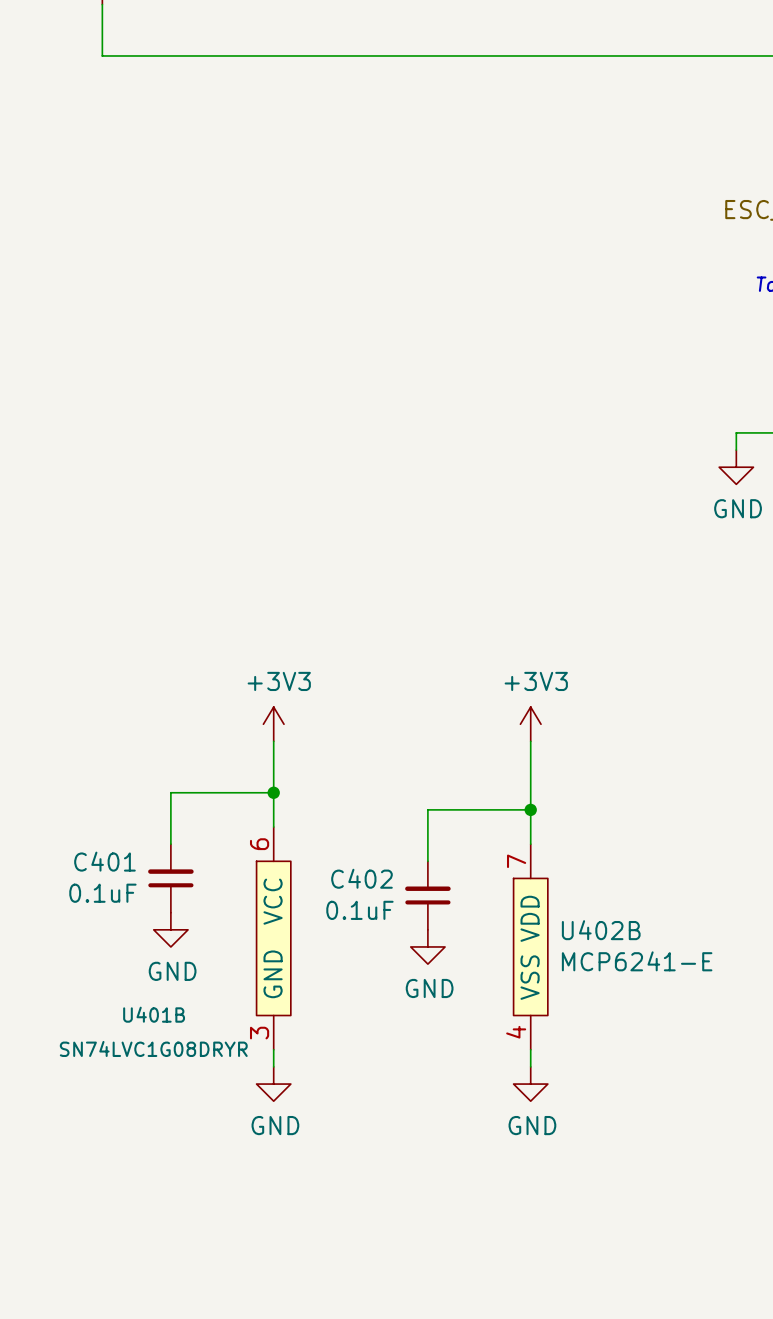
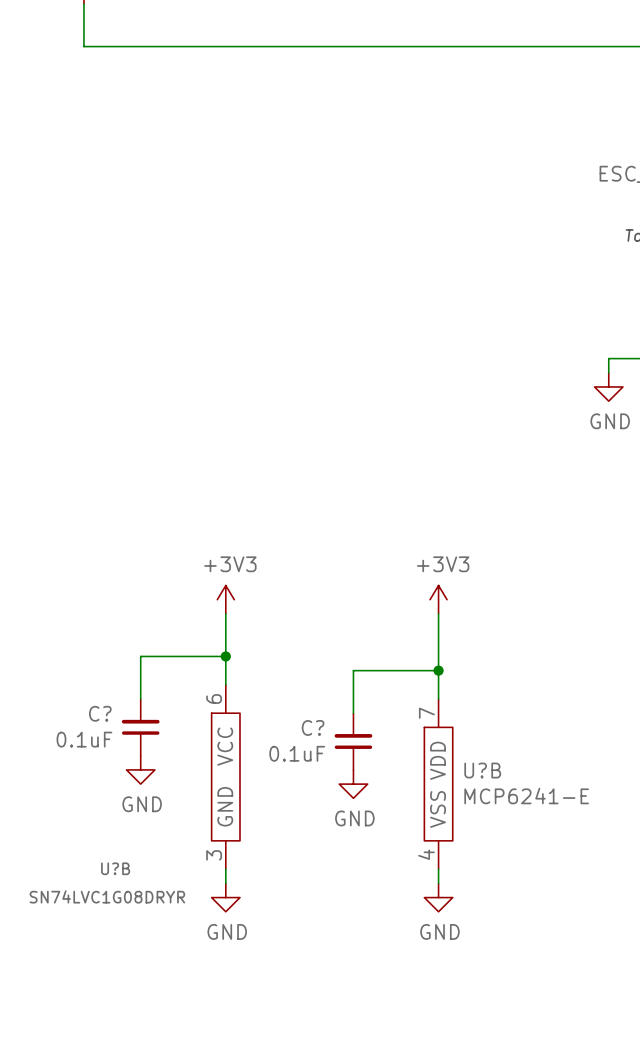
C401 name: C401 (104, 861) -> C? (100, 713)
C402 name: C402 (361, 878) -> C? (313, 727)
U402B name: U402B (601, 930) -> U?B (482, 770)
U401B name: U401B (154, 1014) -> U?B (115, 868)
U401B value position: SN74LVC1G08DRYR (153, 1048) -> SN74LVC1G08DRYR (107, 896)

